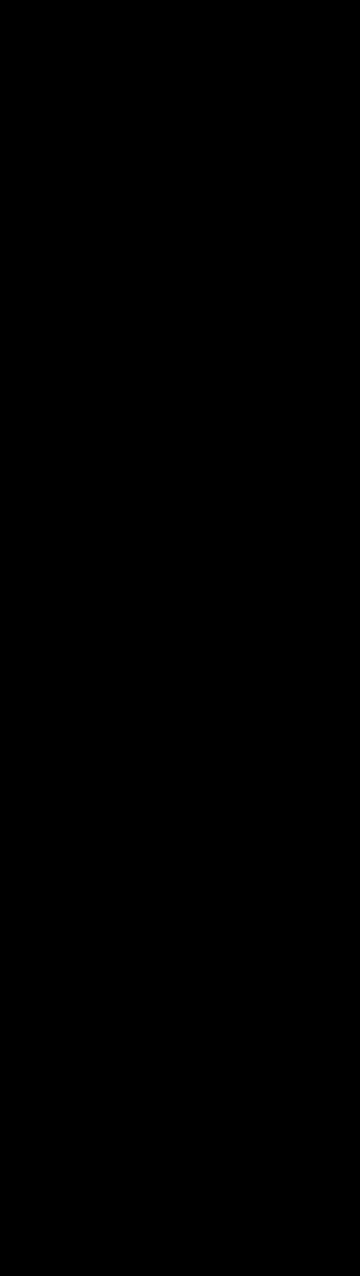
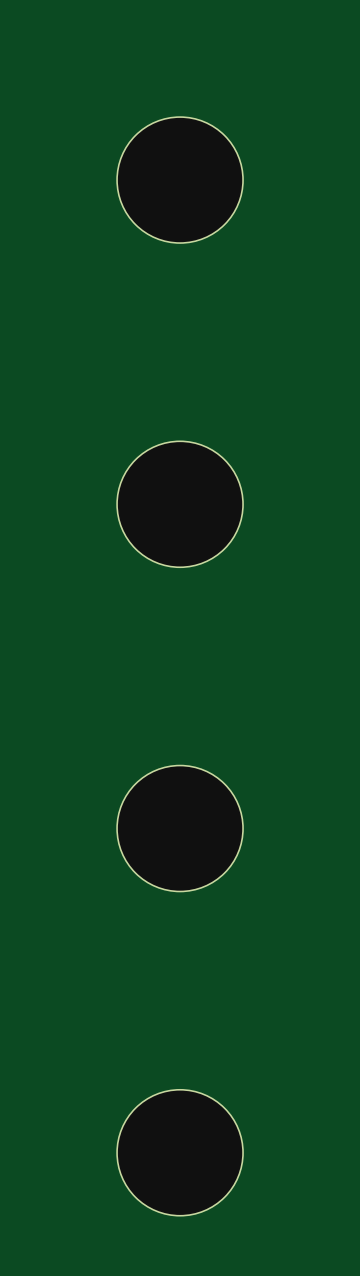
part: none -> (180, 180)
part: none -> (180, 504)
part: none -> (180, 828)
part: none -> (180, 1152)

